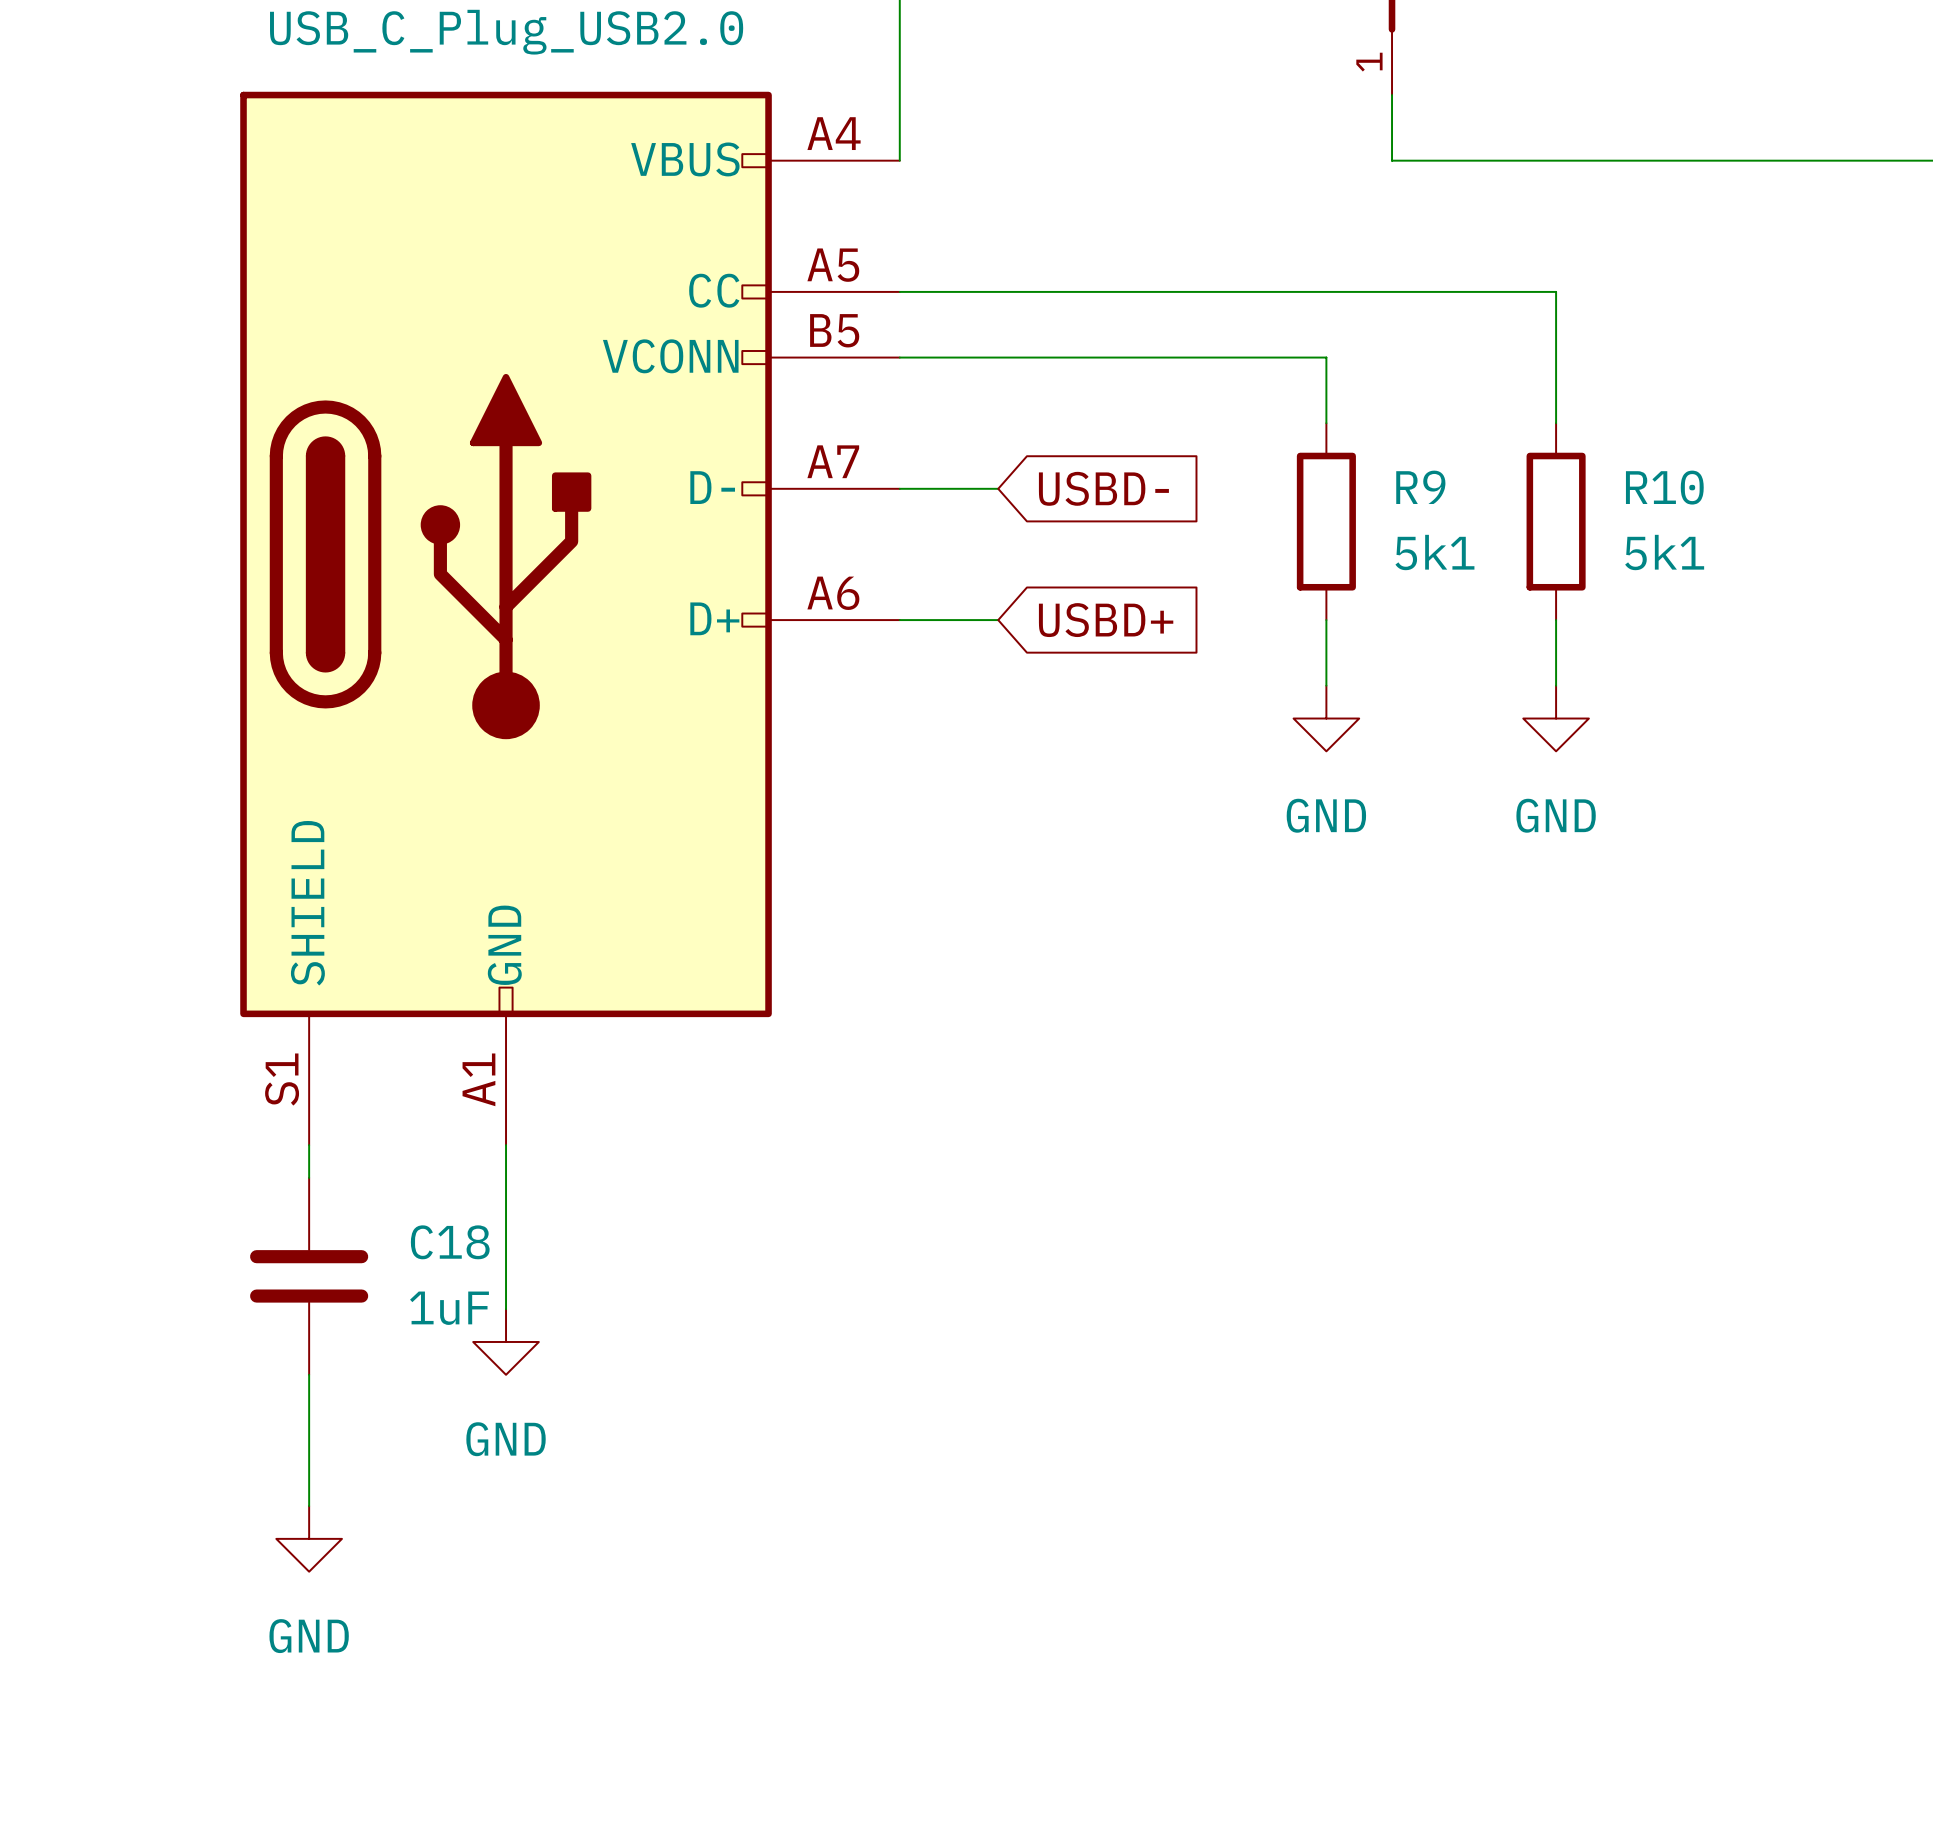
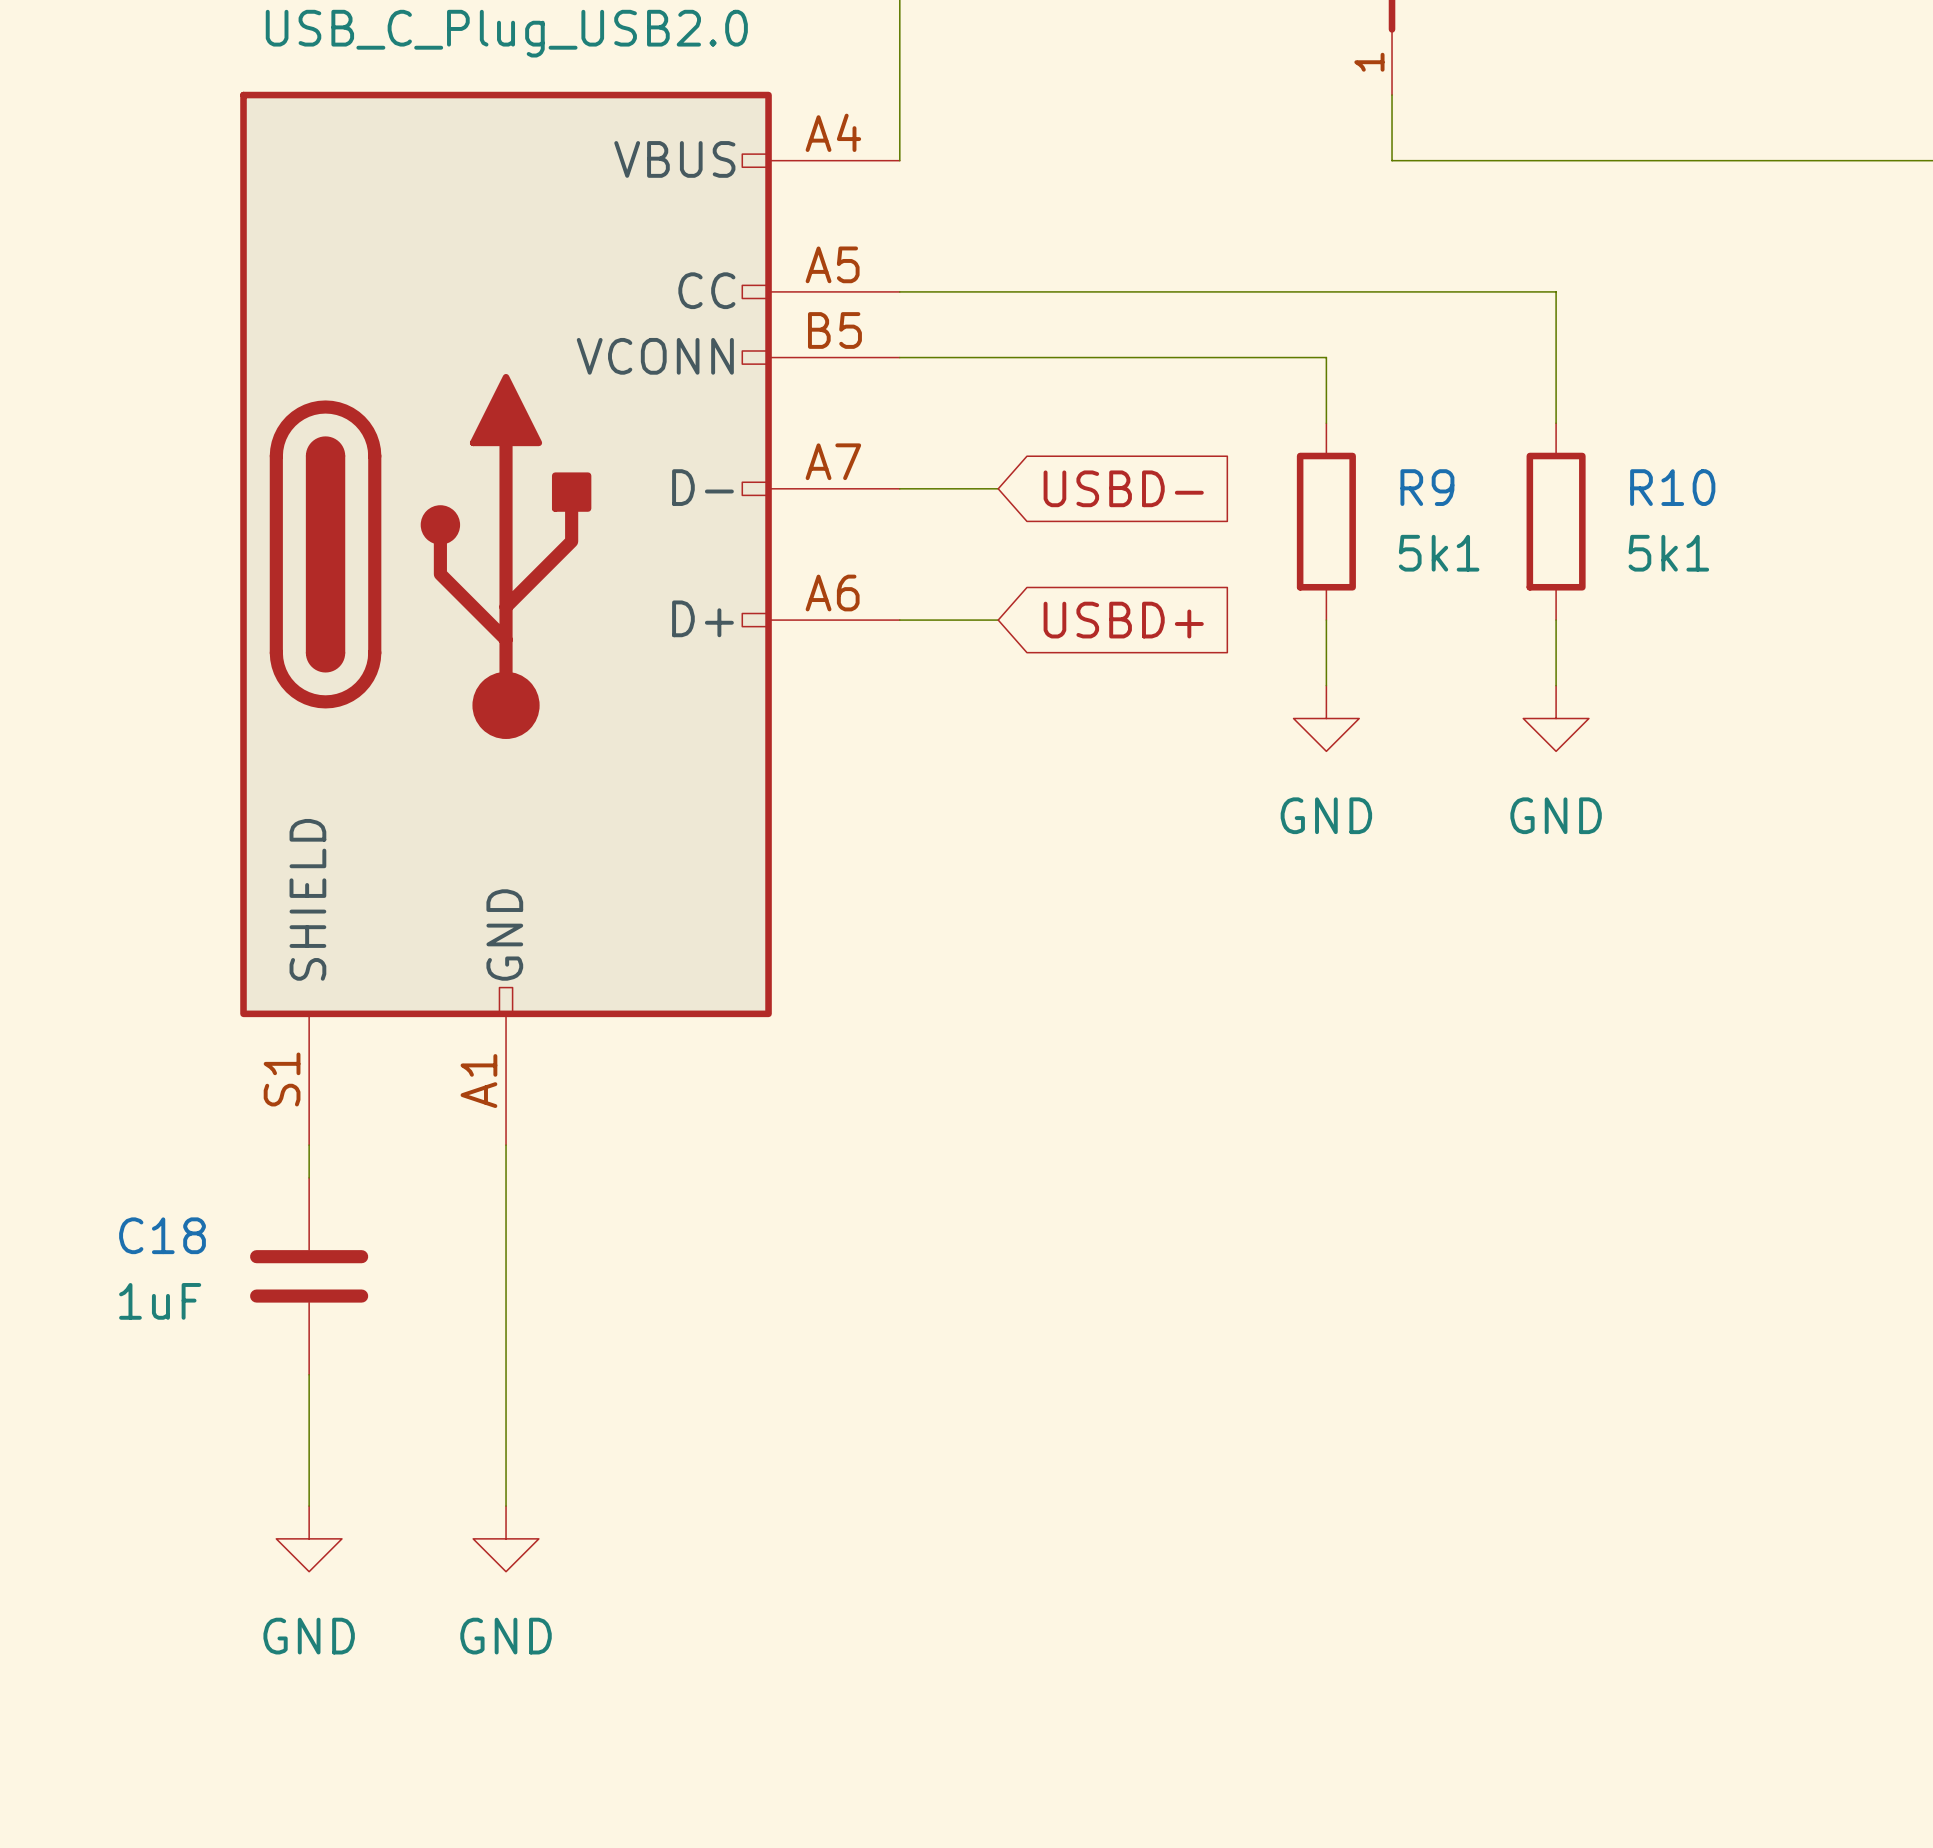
C18 name position: C18 (450, 1242) -> C18 (162, 1235)
C18 value position: 1uF (449, 1308) -> 1uF (160, 1301)
wire: none -> (506, 1309) (506, 1506)
power symbol position: GND (506, 1341) -> GND (506, 1538)

